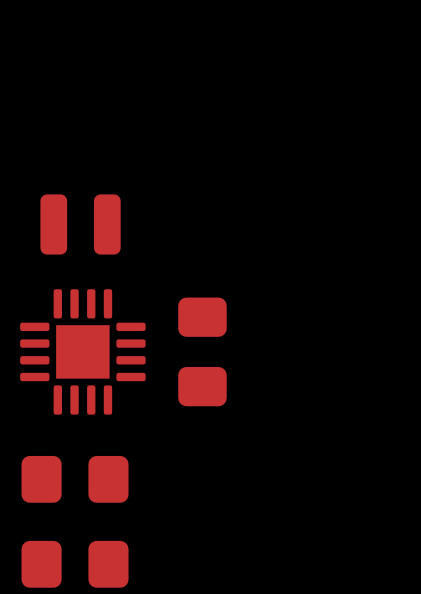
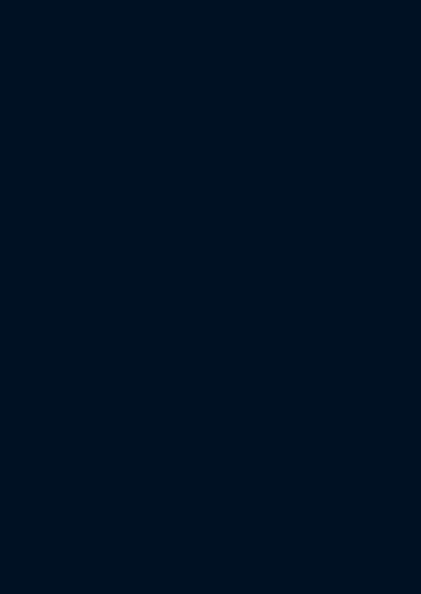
part: (80, 224) -> none
part: (82, 351) -> none
part: (202, 351) -> none
part: (75, 479) -> none
part: (75, 564) -> none

